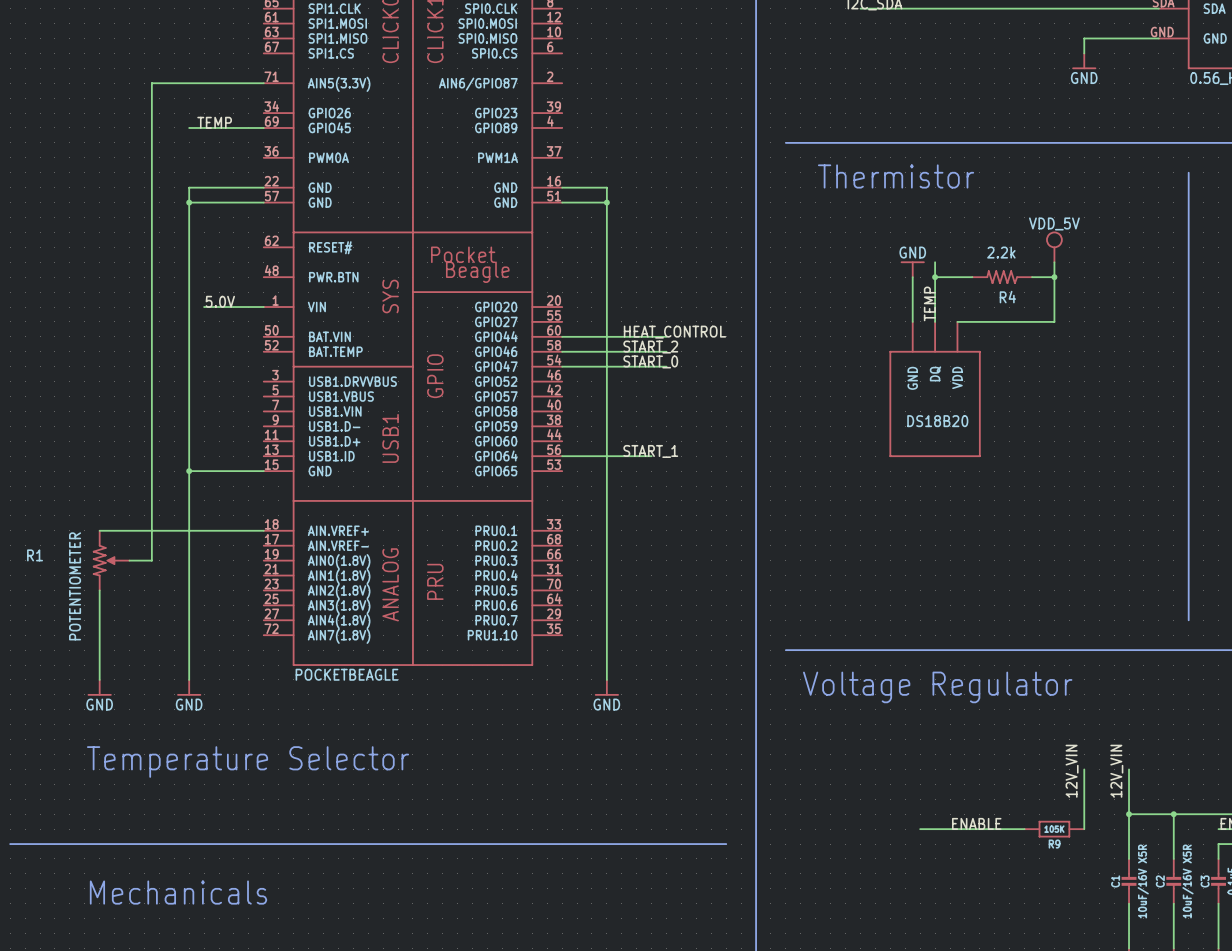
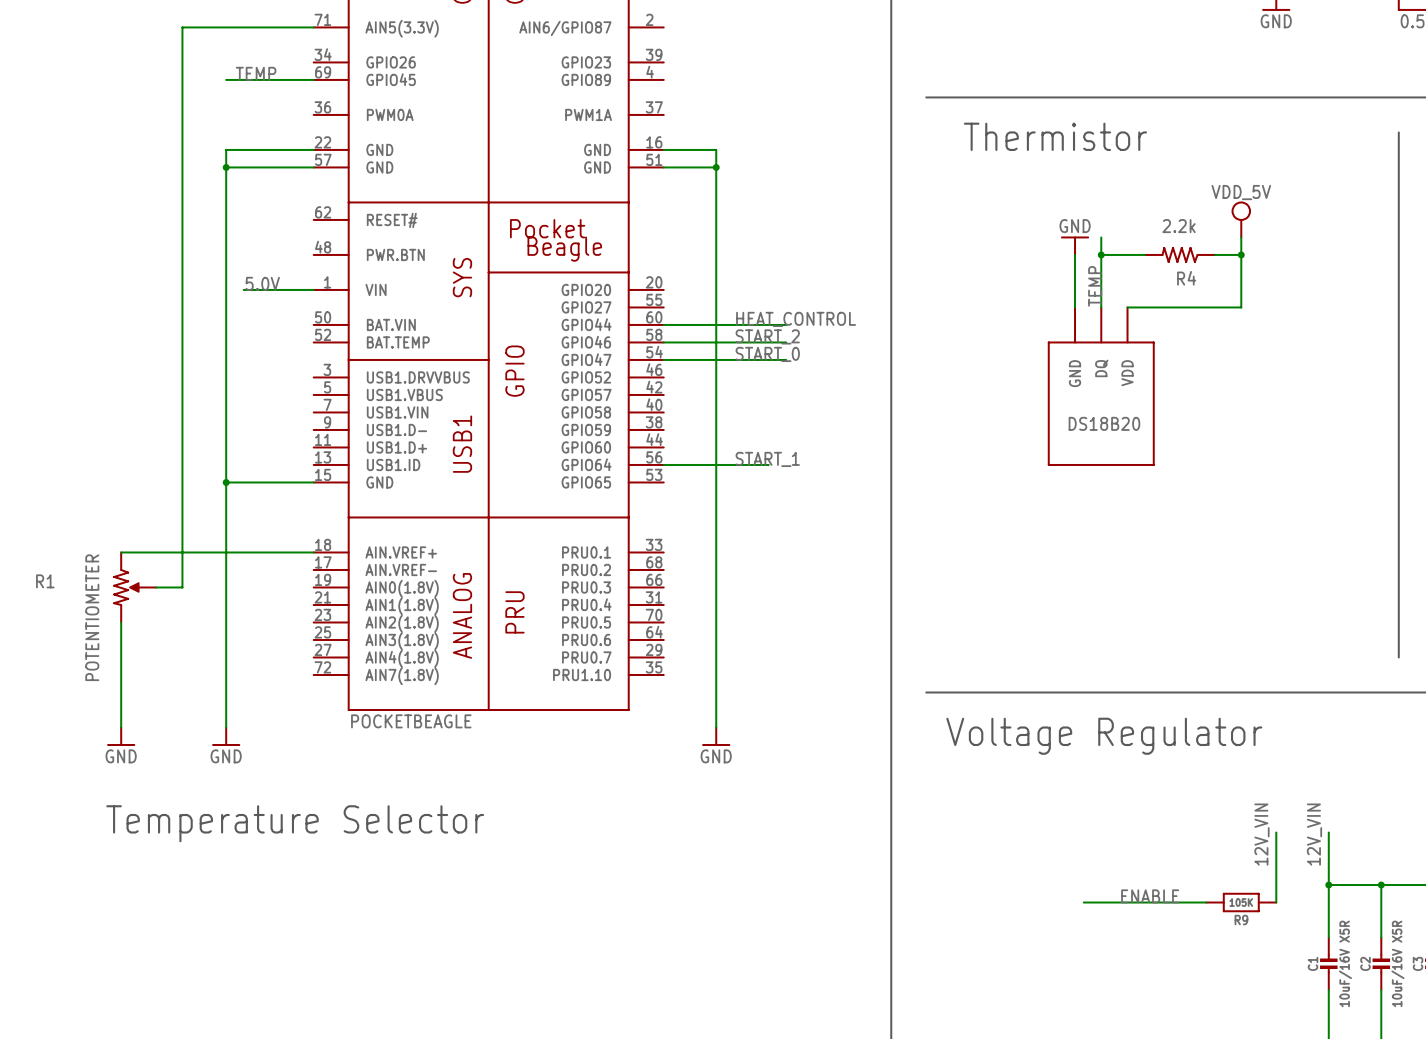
line: (10, 844) (726, 844) -> none
text: Mechanicals (178, 892) -> none

